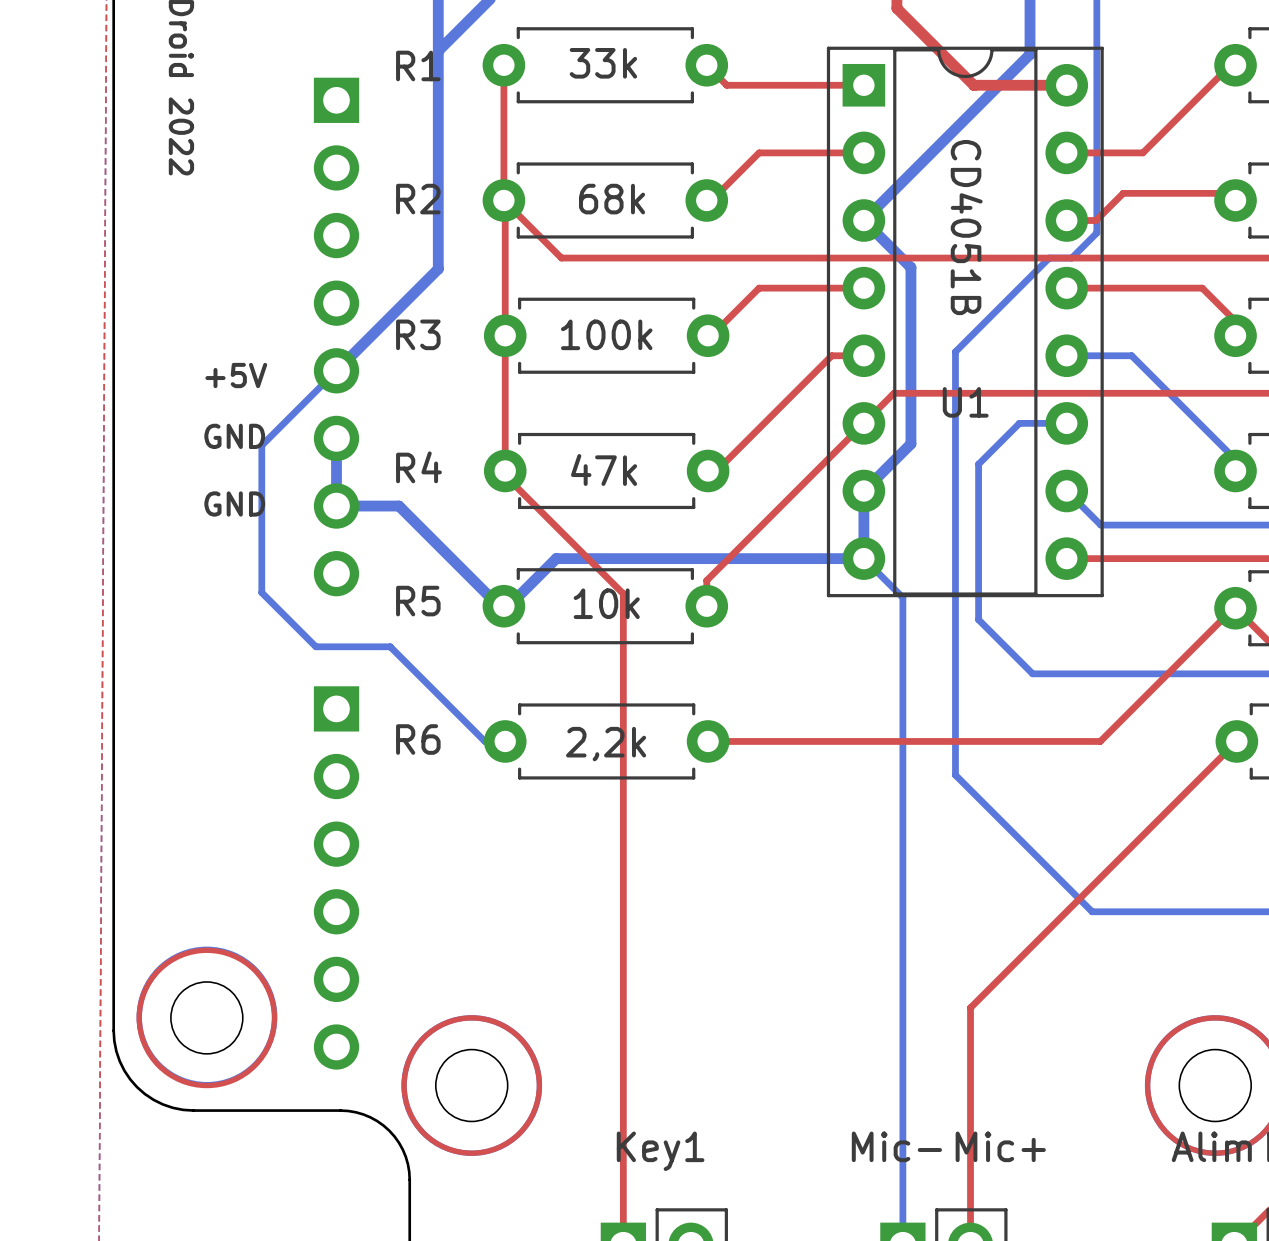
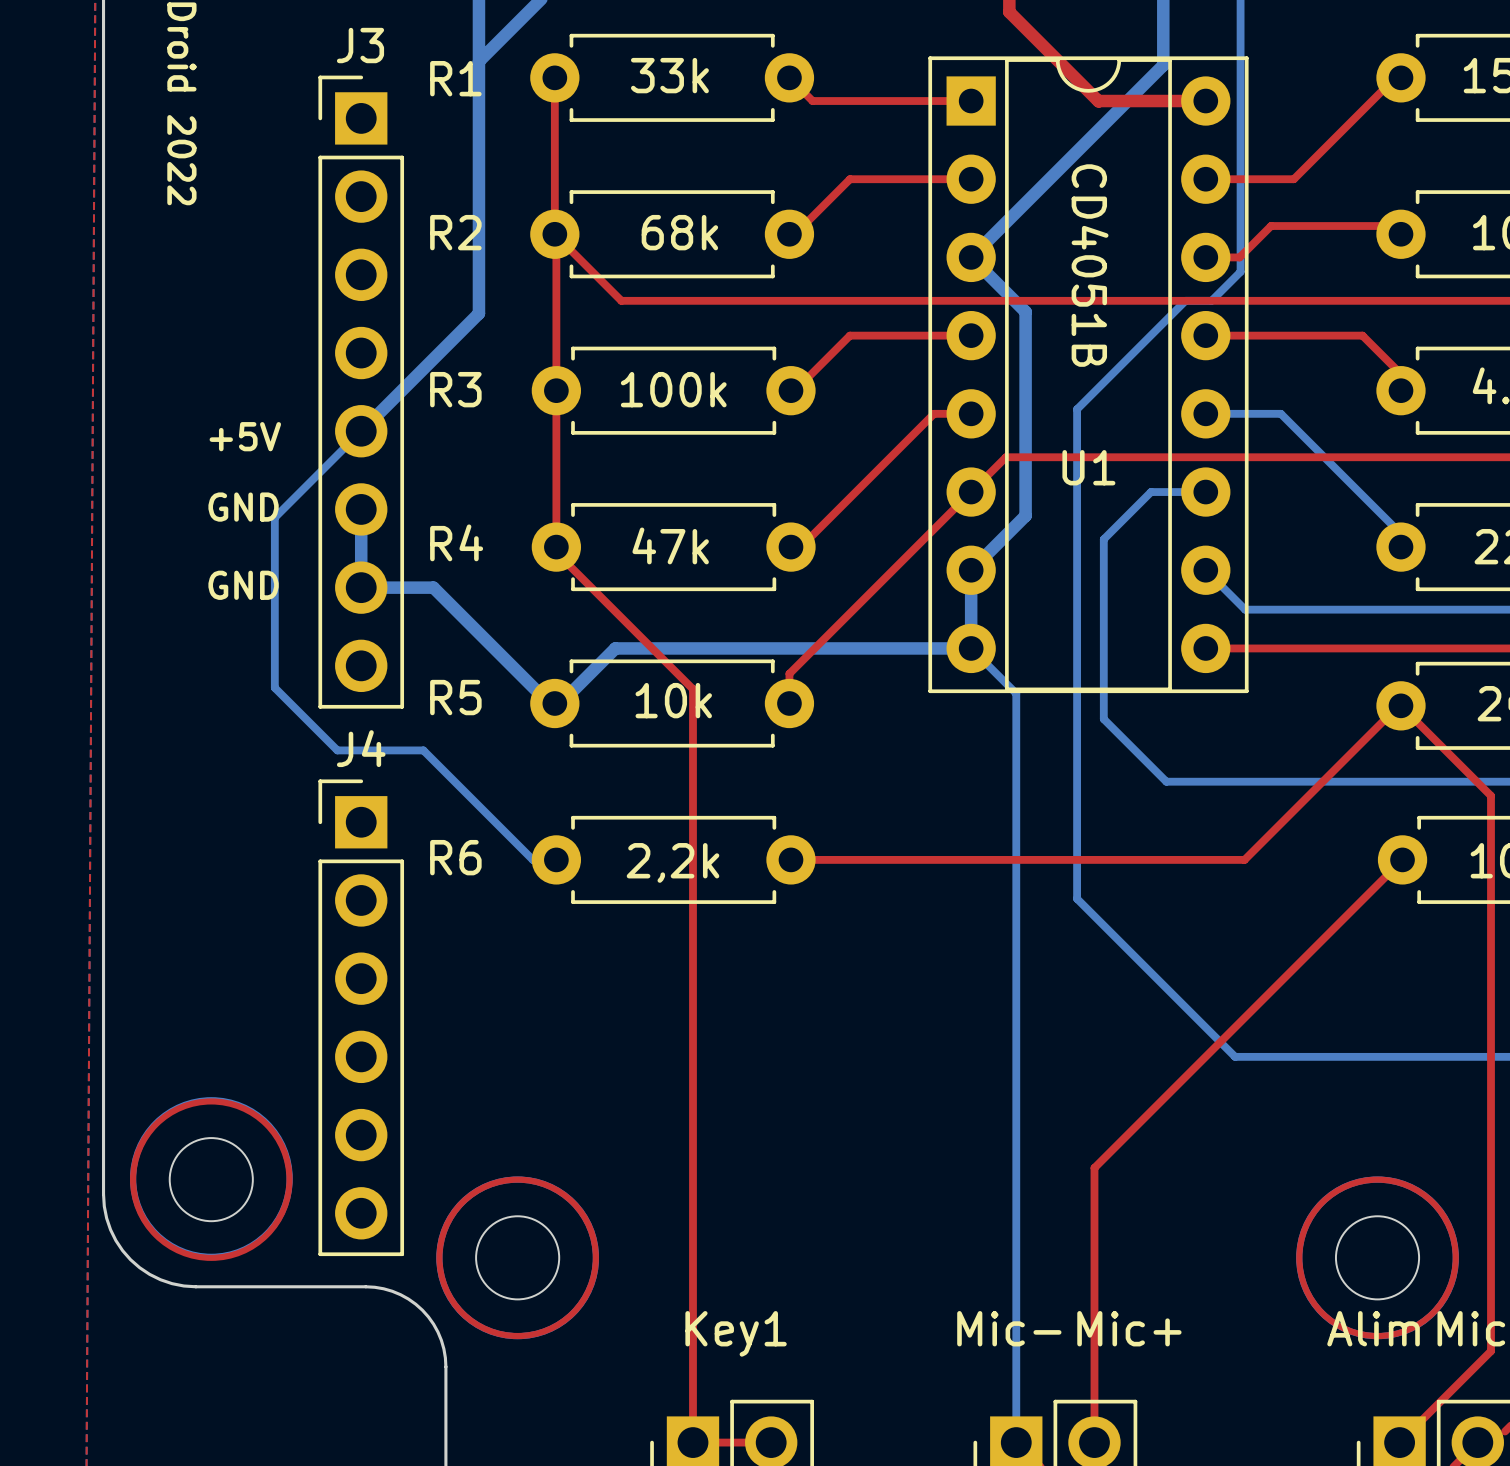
J3 side: bottom (336, 336) -> top (361, 392)
J4 side: bottom (336, 877) -> top (361, 1017)

